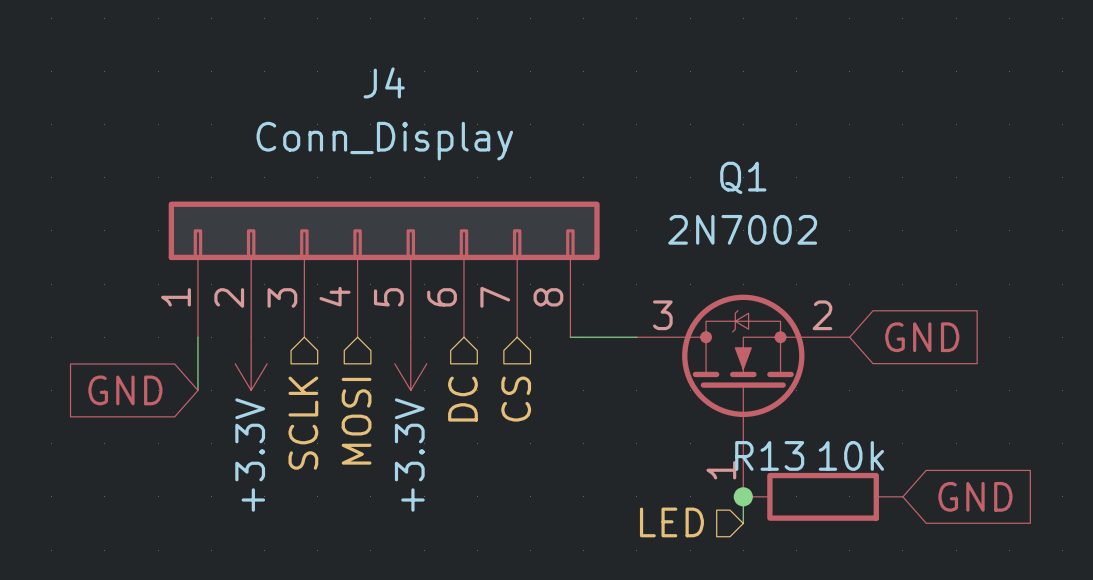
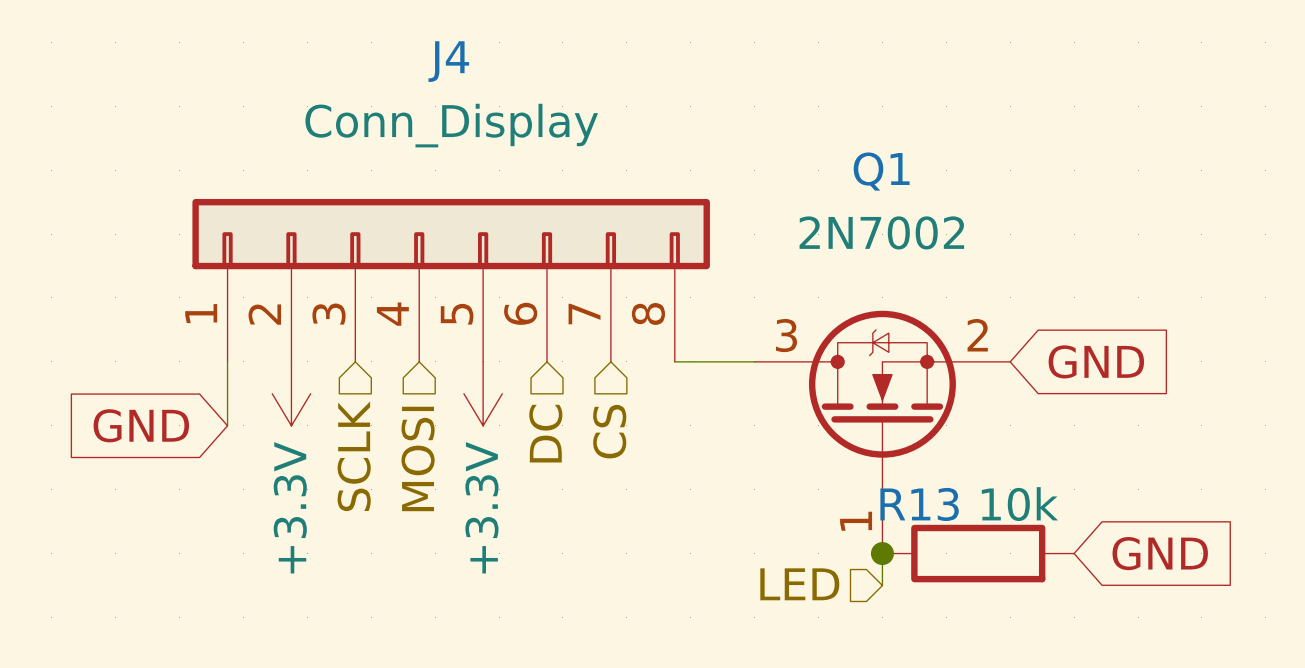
power symbol text position: +3.3V (250, 455) -> +3.3V (290, 507)
power symbol text position: +3.3V (409, 455) -> +3.3V (481, 507)

